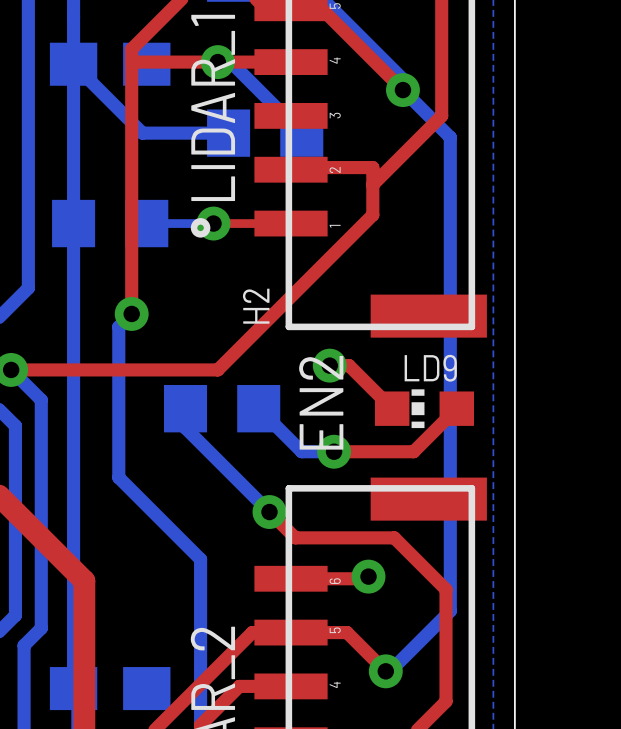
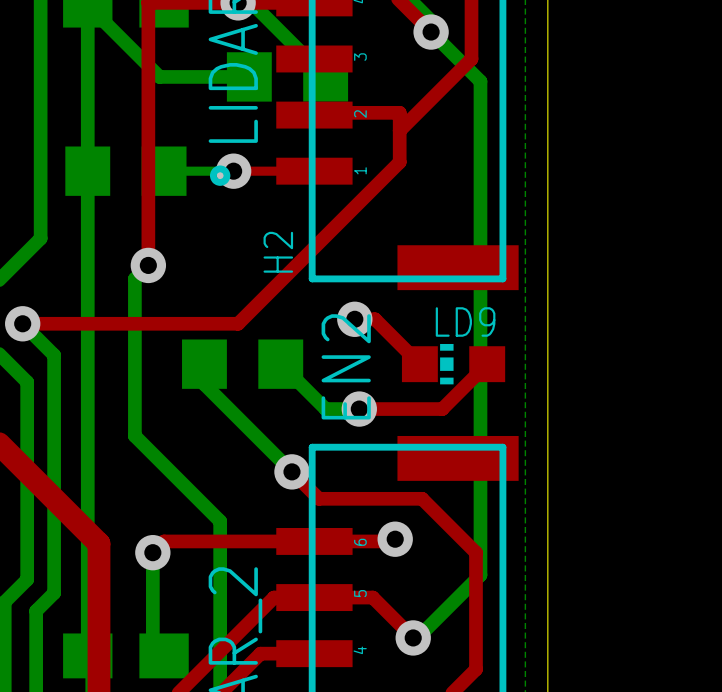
top track: none -> (314, 541) (164, 541) (152, 552)
bottom track: none -> (152, 552) (152, 644) (164, 655)
via: none -> (152, 552)

